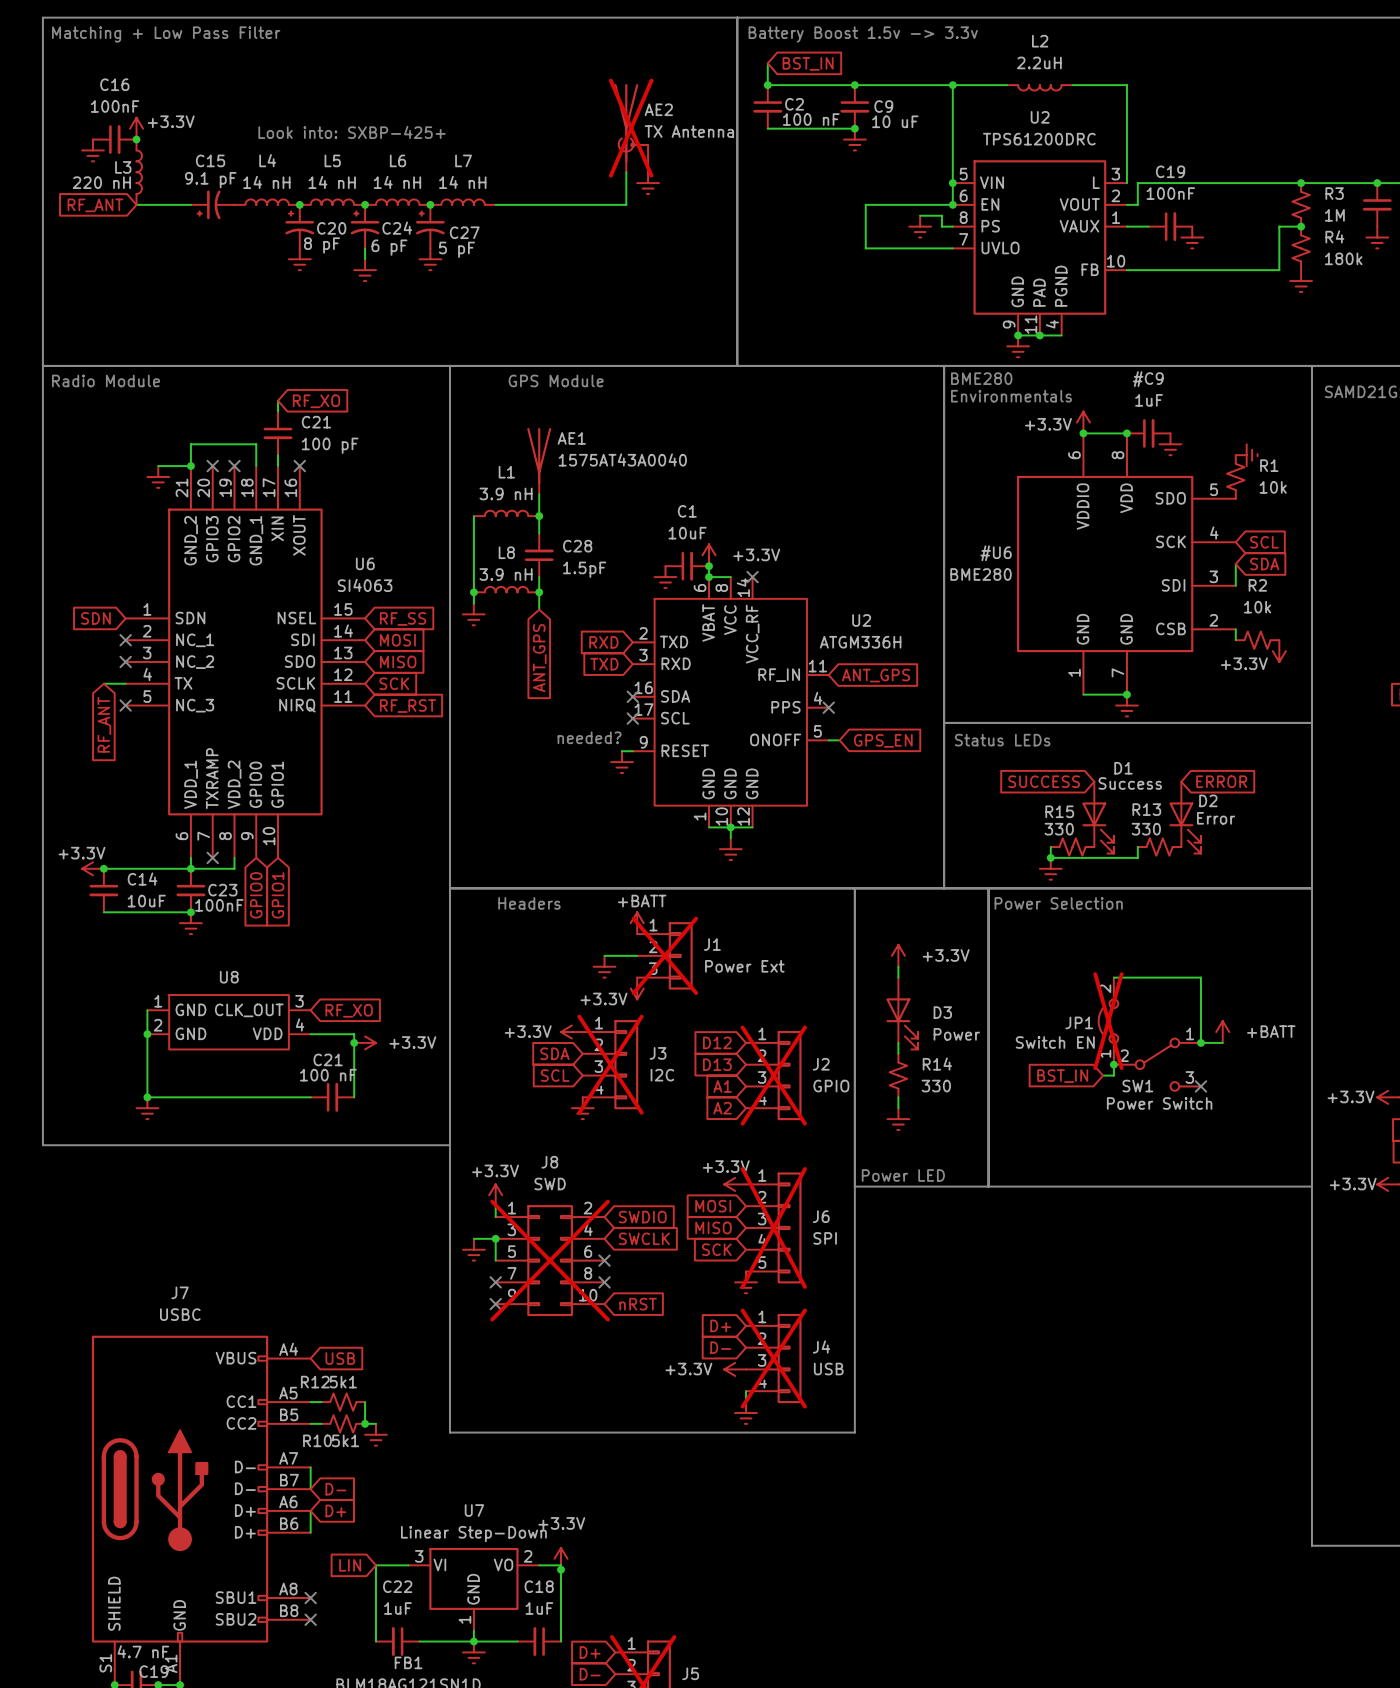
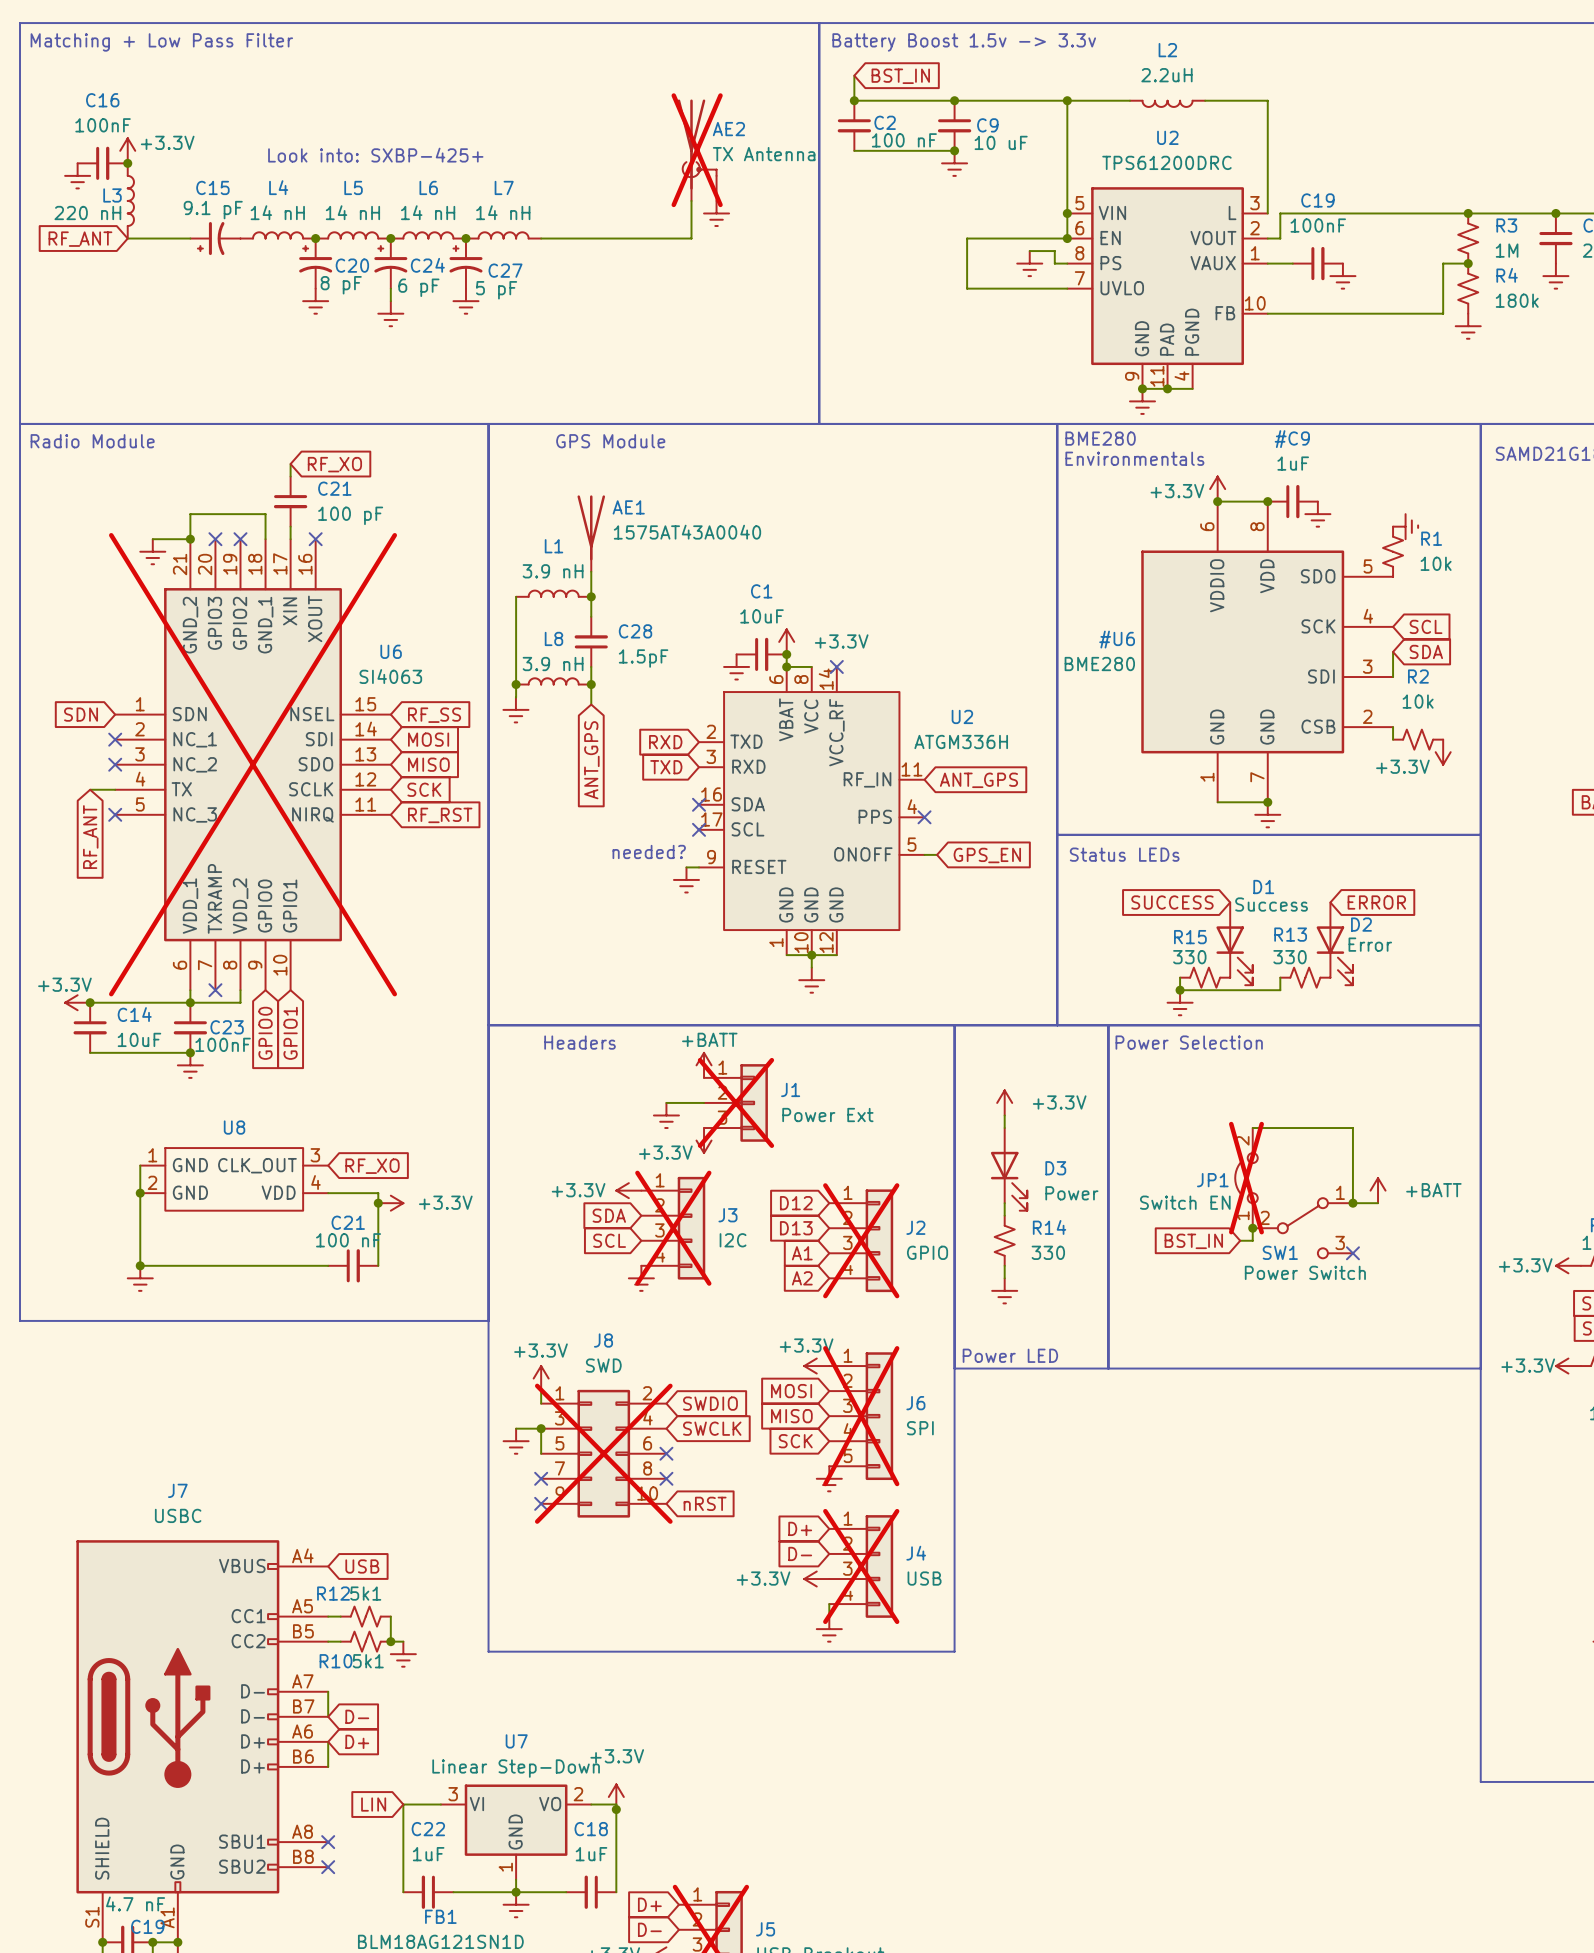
U6 do-not-place cross: none -> (253, 764)

